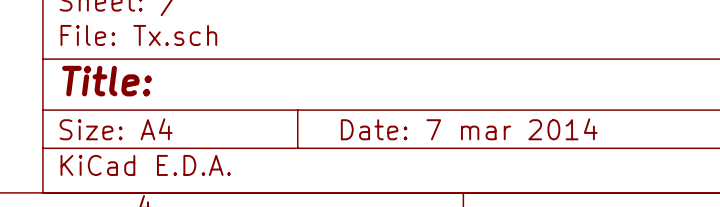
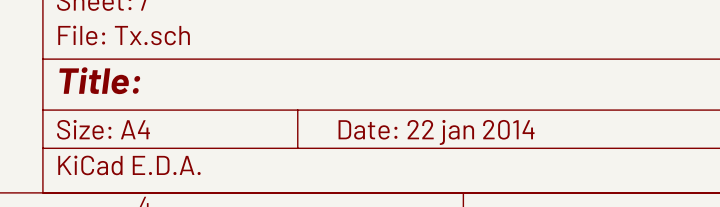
title block: Date: 7 mar 2014 (469, 129) -> Date: 22 jan 2014 (436, 132)

